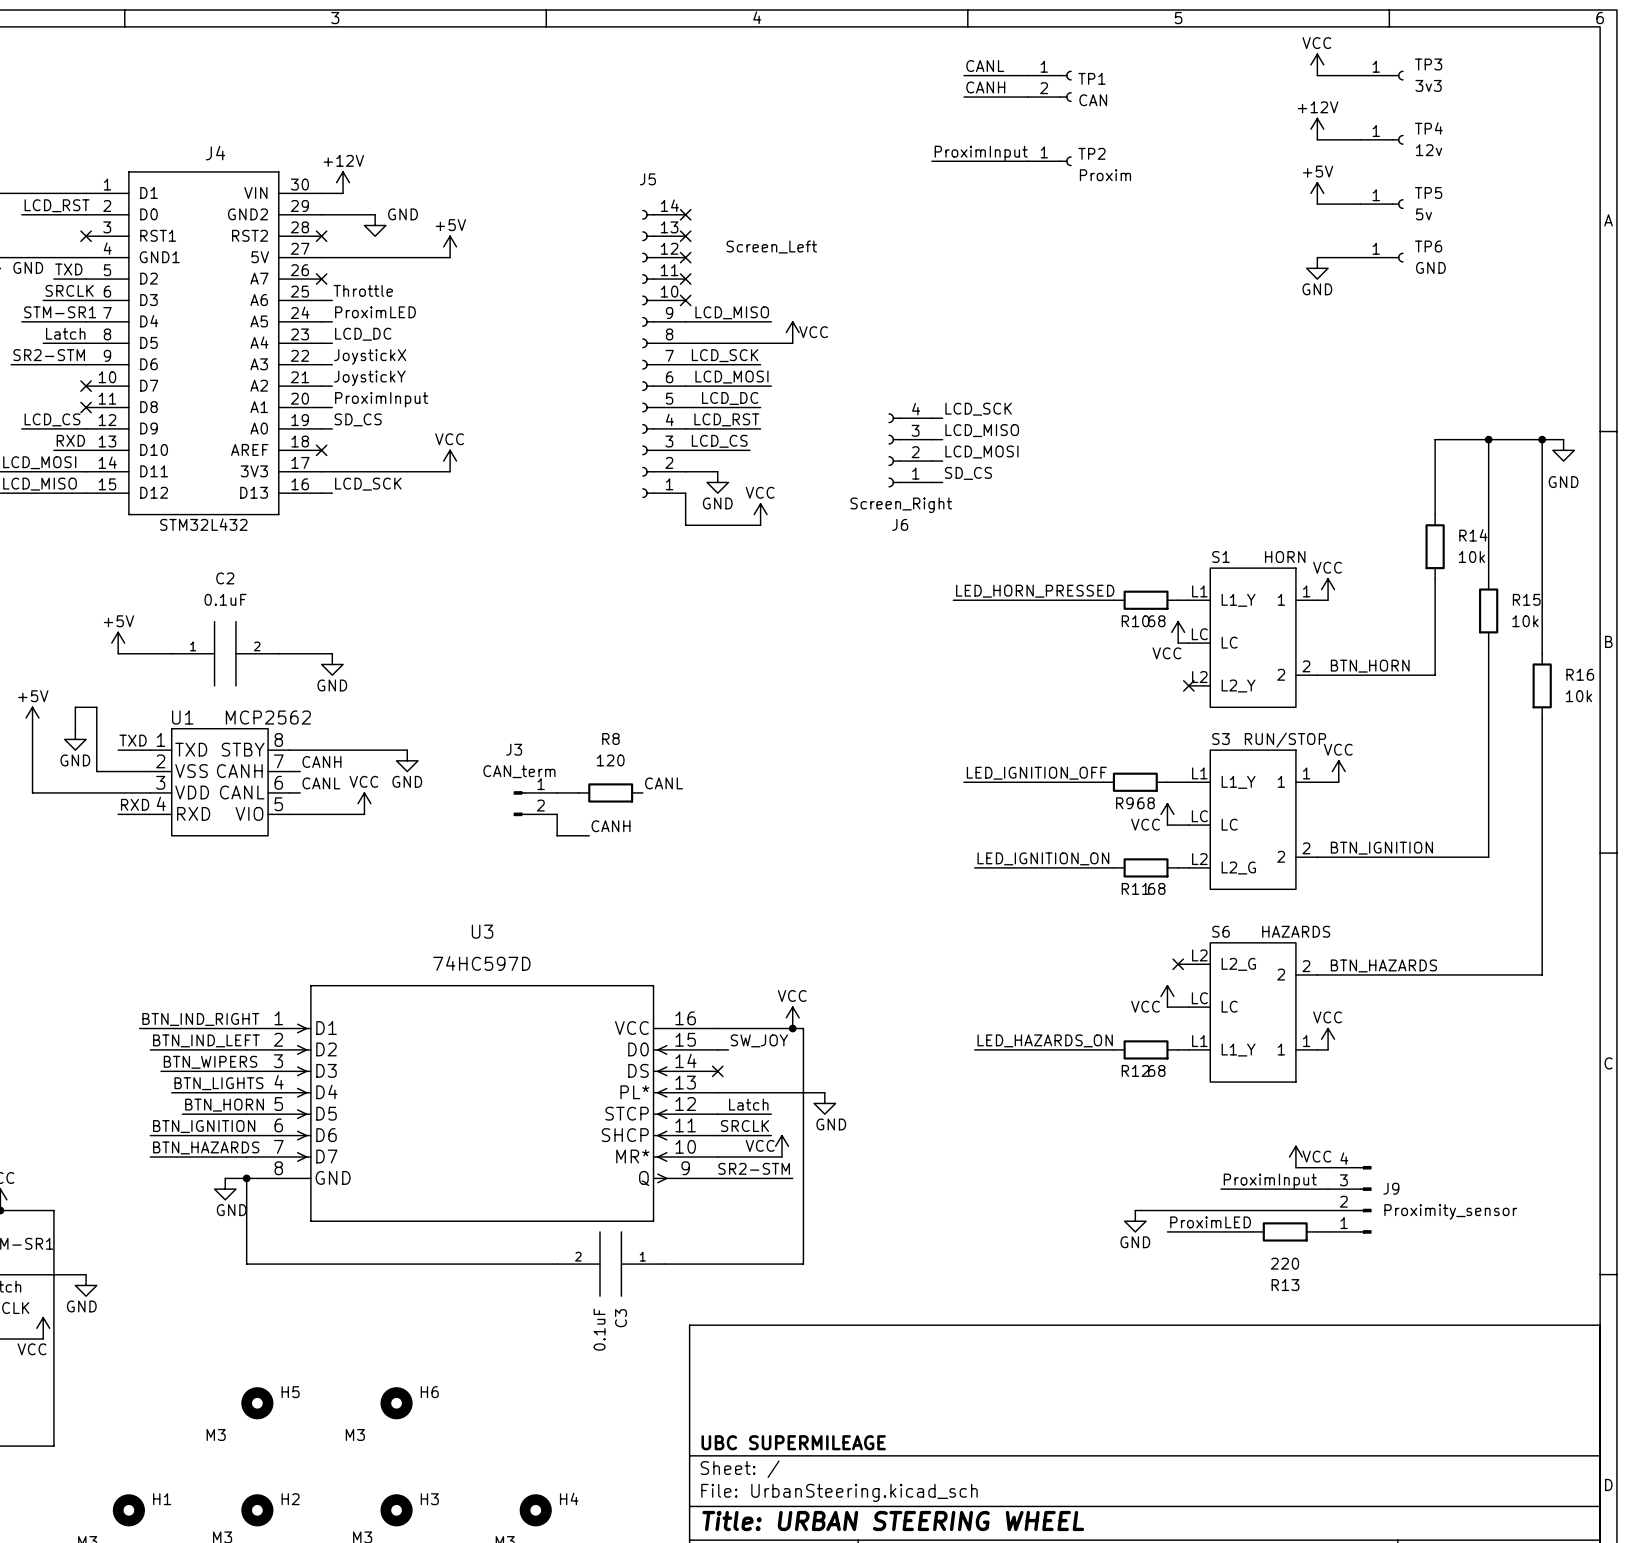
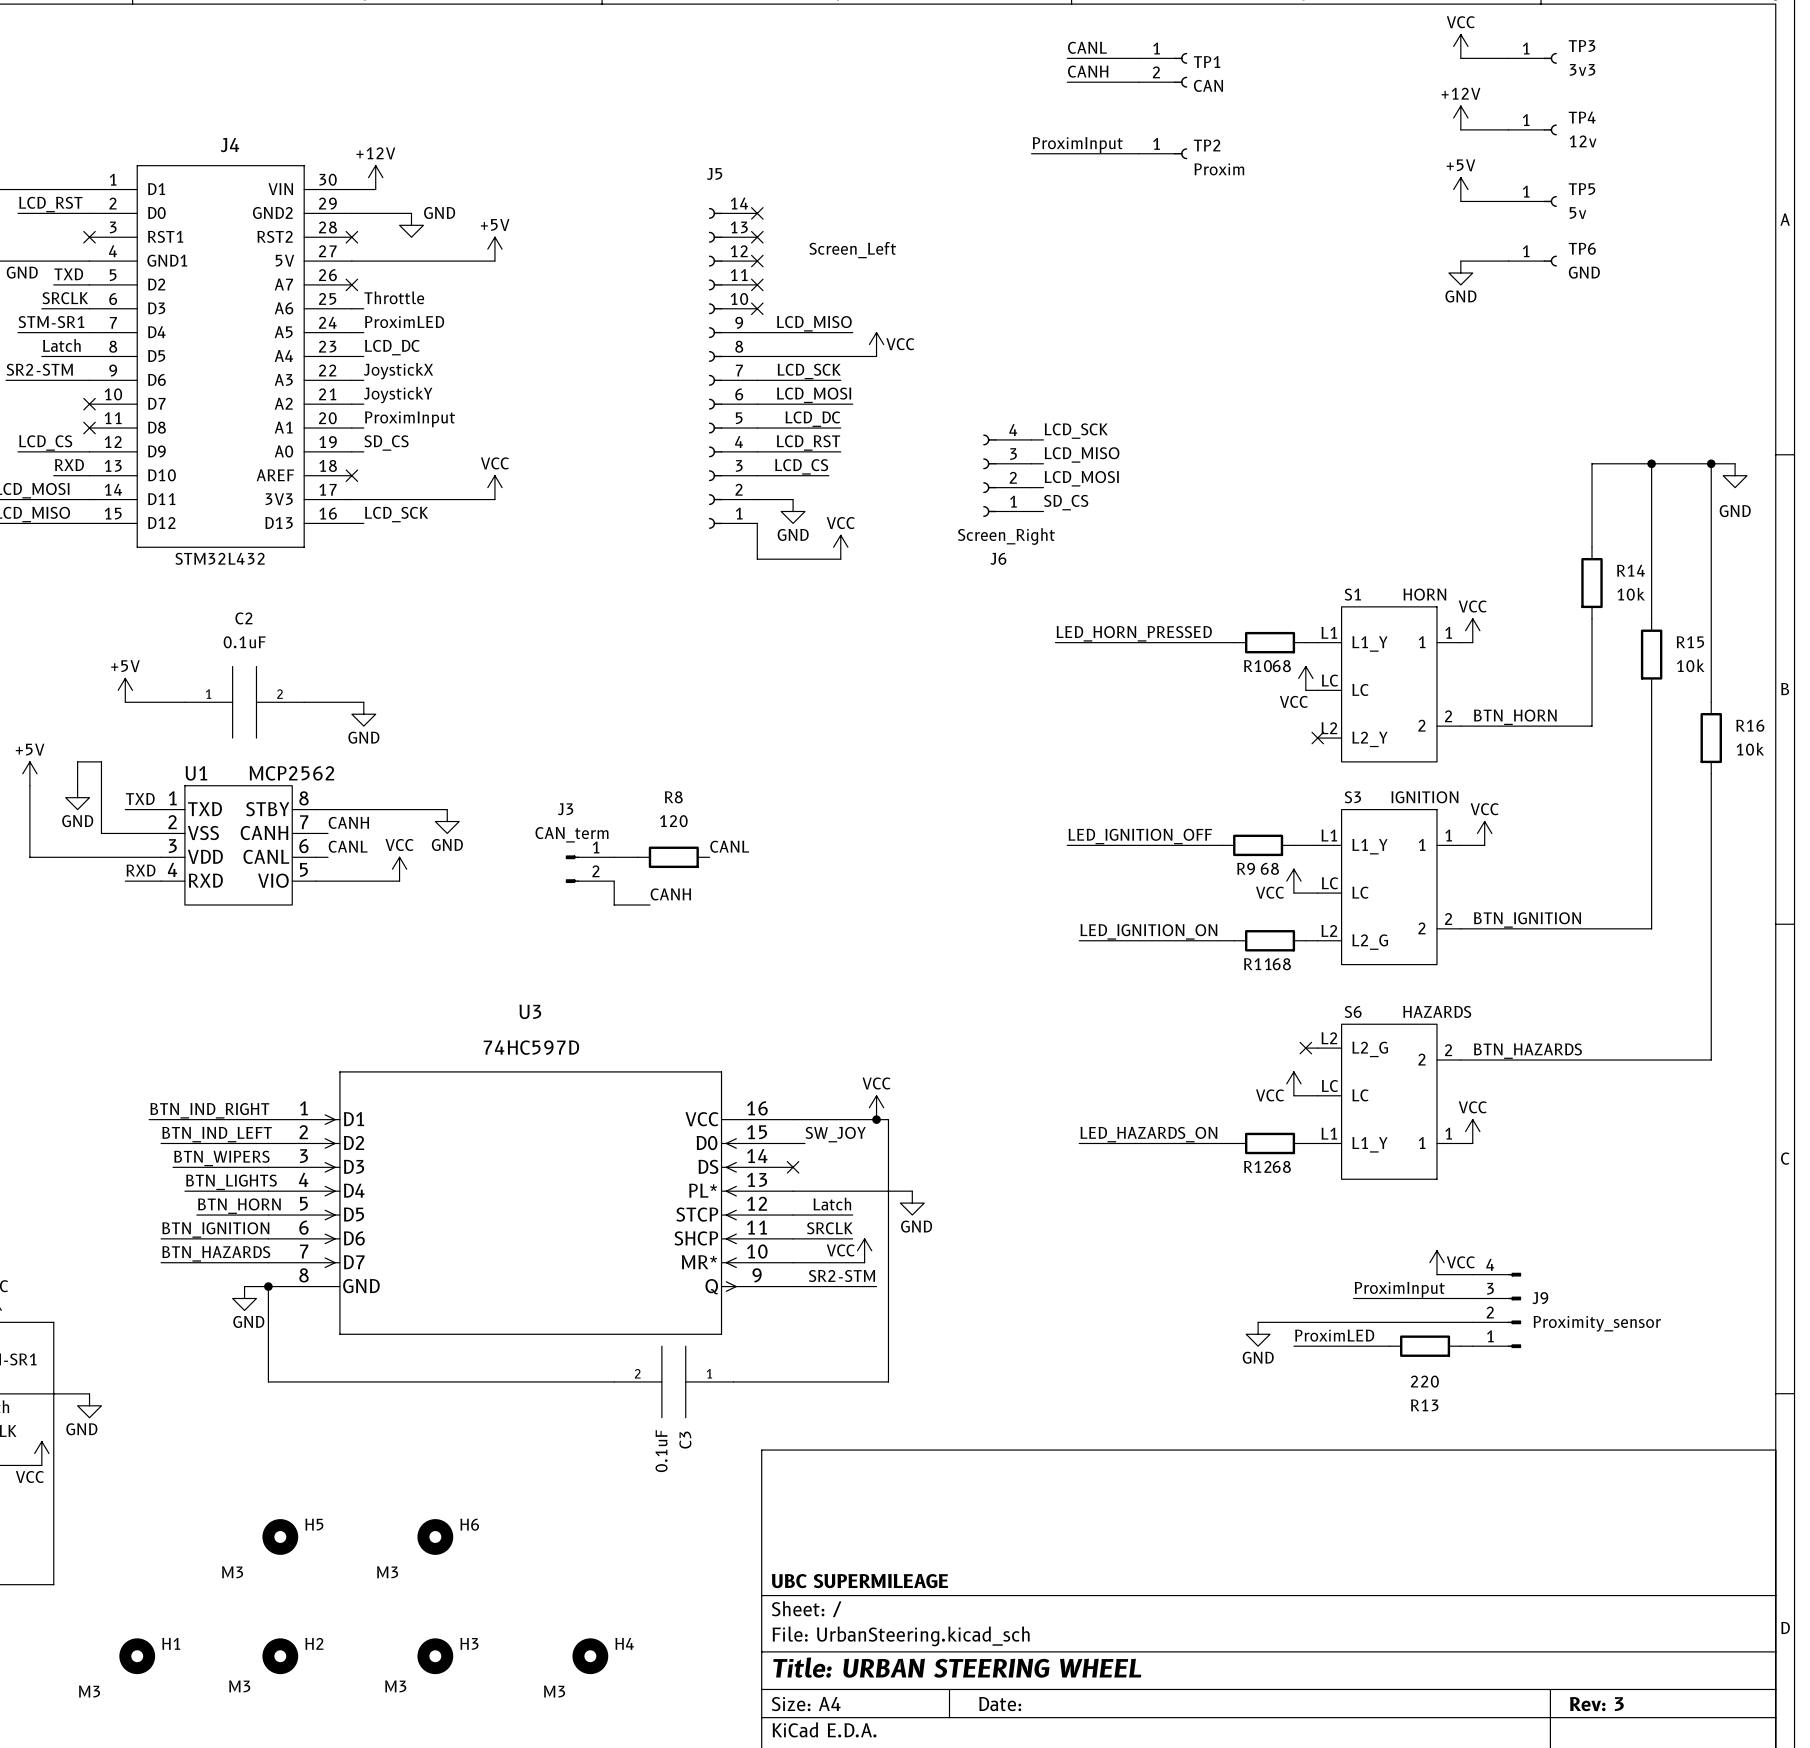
S3 value: RUN/STOP (1285, 740) -> IGNITION (1424, 797)

